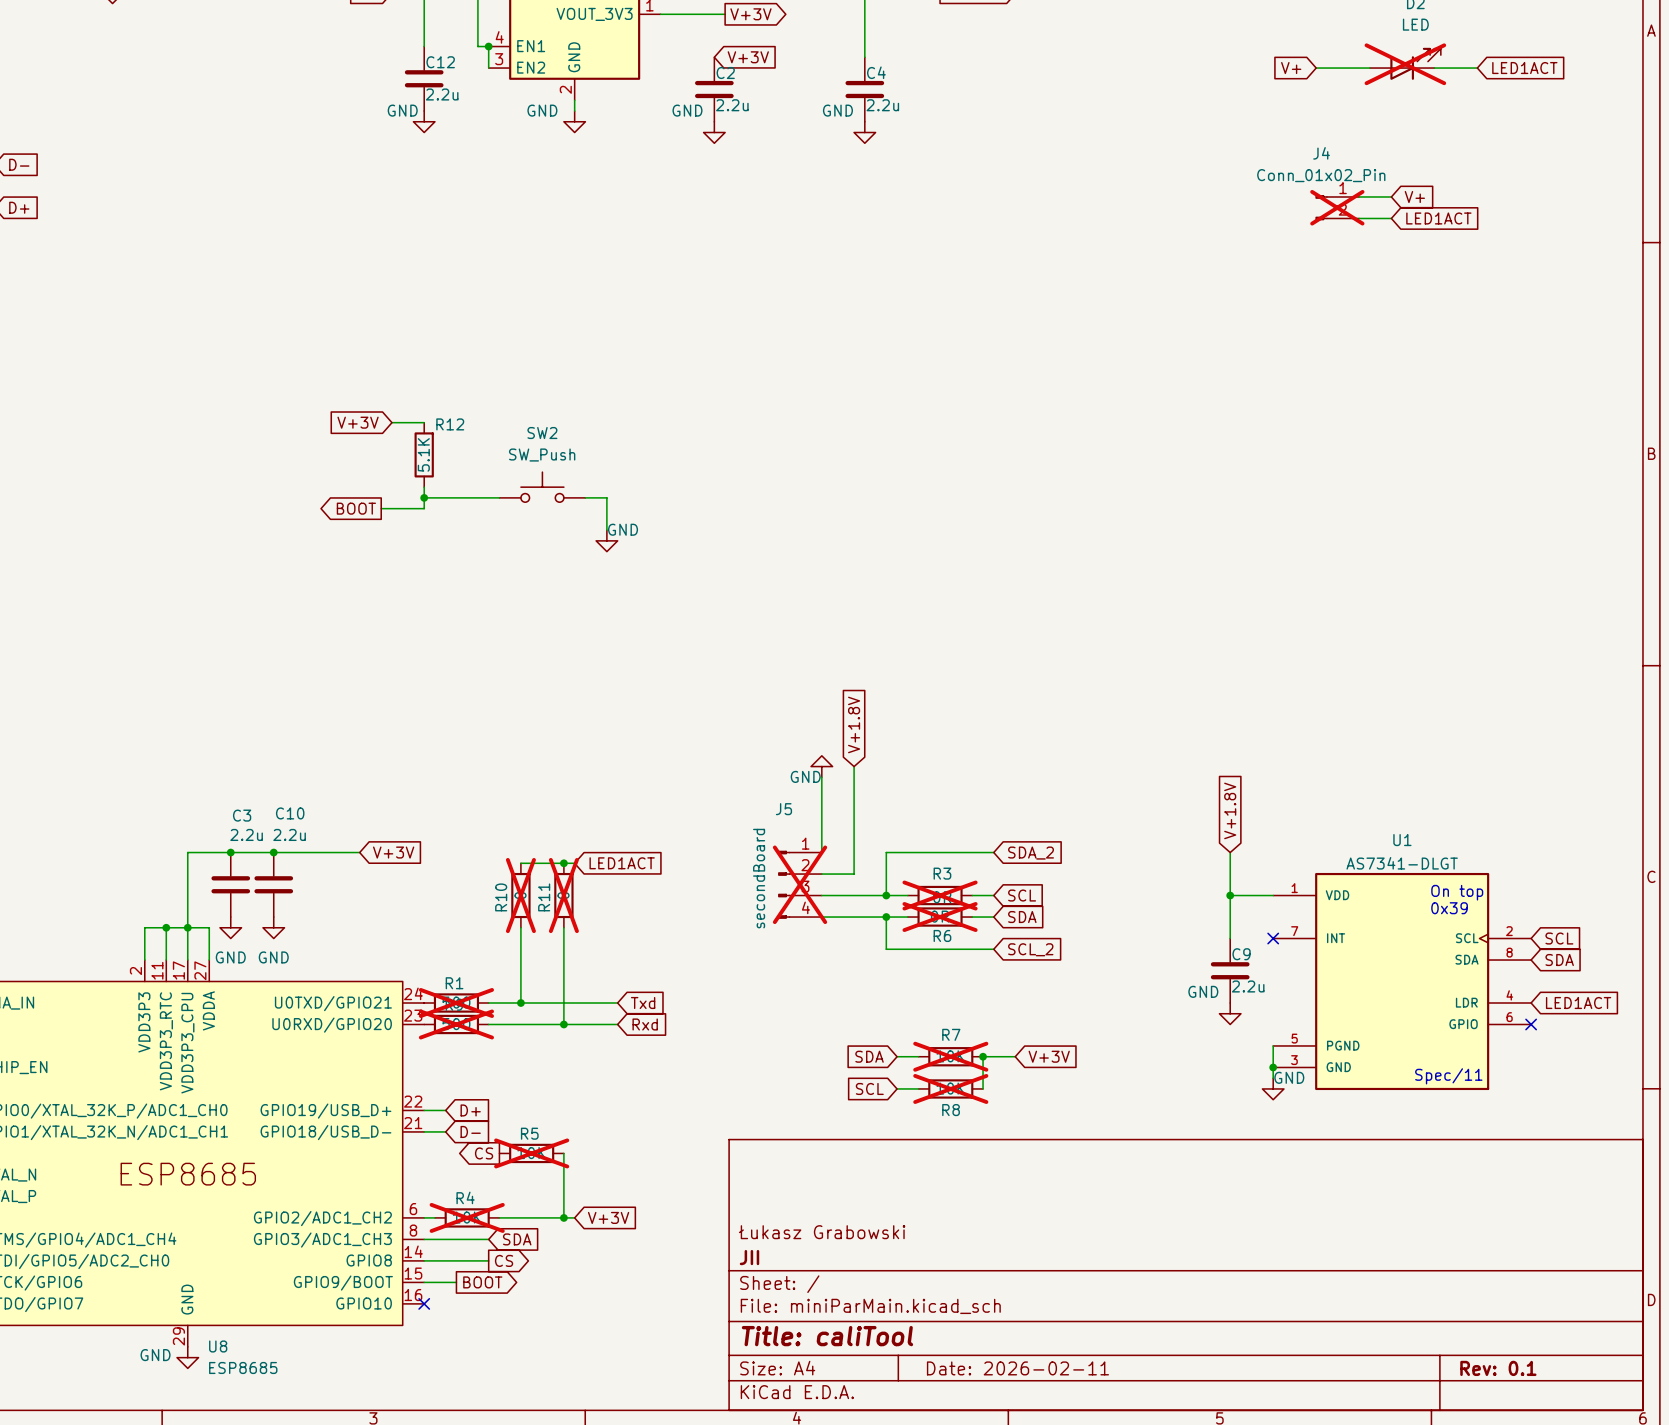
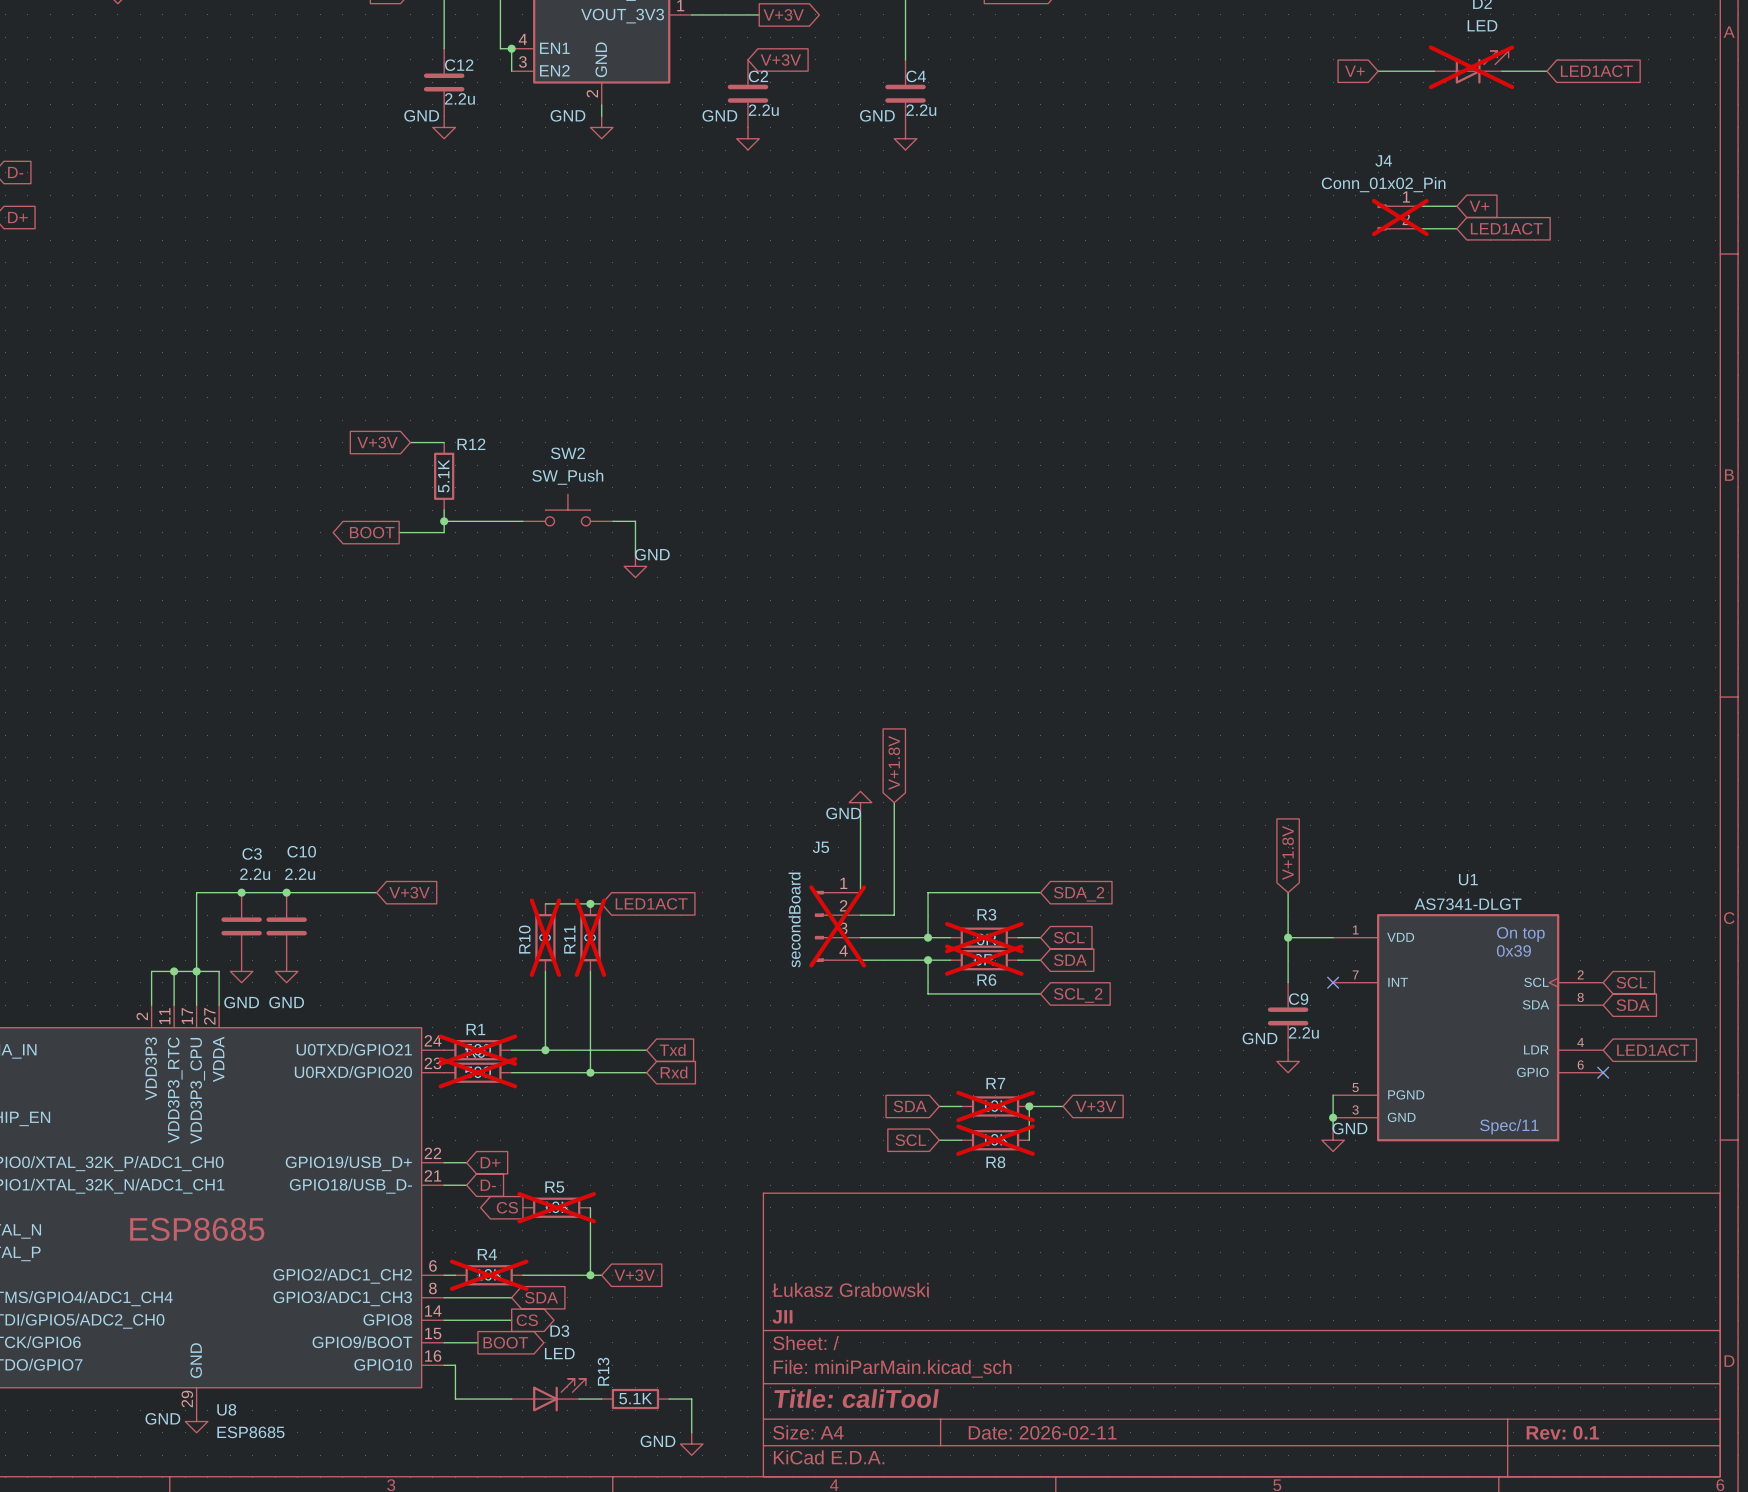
wire: none -> (444, 1365) (455, 1365) (455, 1399) (511, 1399)
no-connect mark: (424, 1303) -> none
D3: none -> LED (548, 1395)
wire: none -> (579, 1399) (601, 1399)
R13: none -> 5.1K (635, 1399)
wire: none -> (669, 1399) (691, 1399) (691, 1432)
power symbol: none -> GND (691, 1444)

